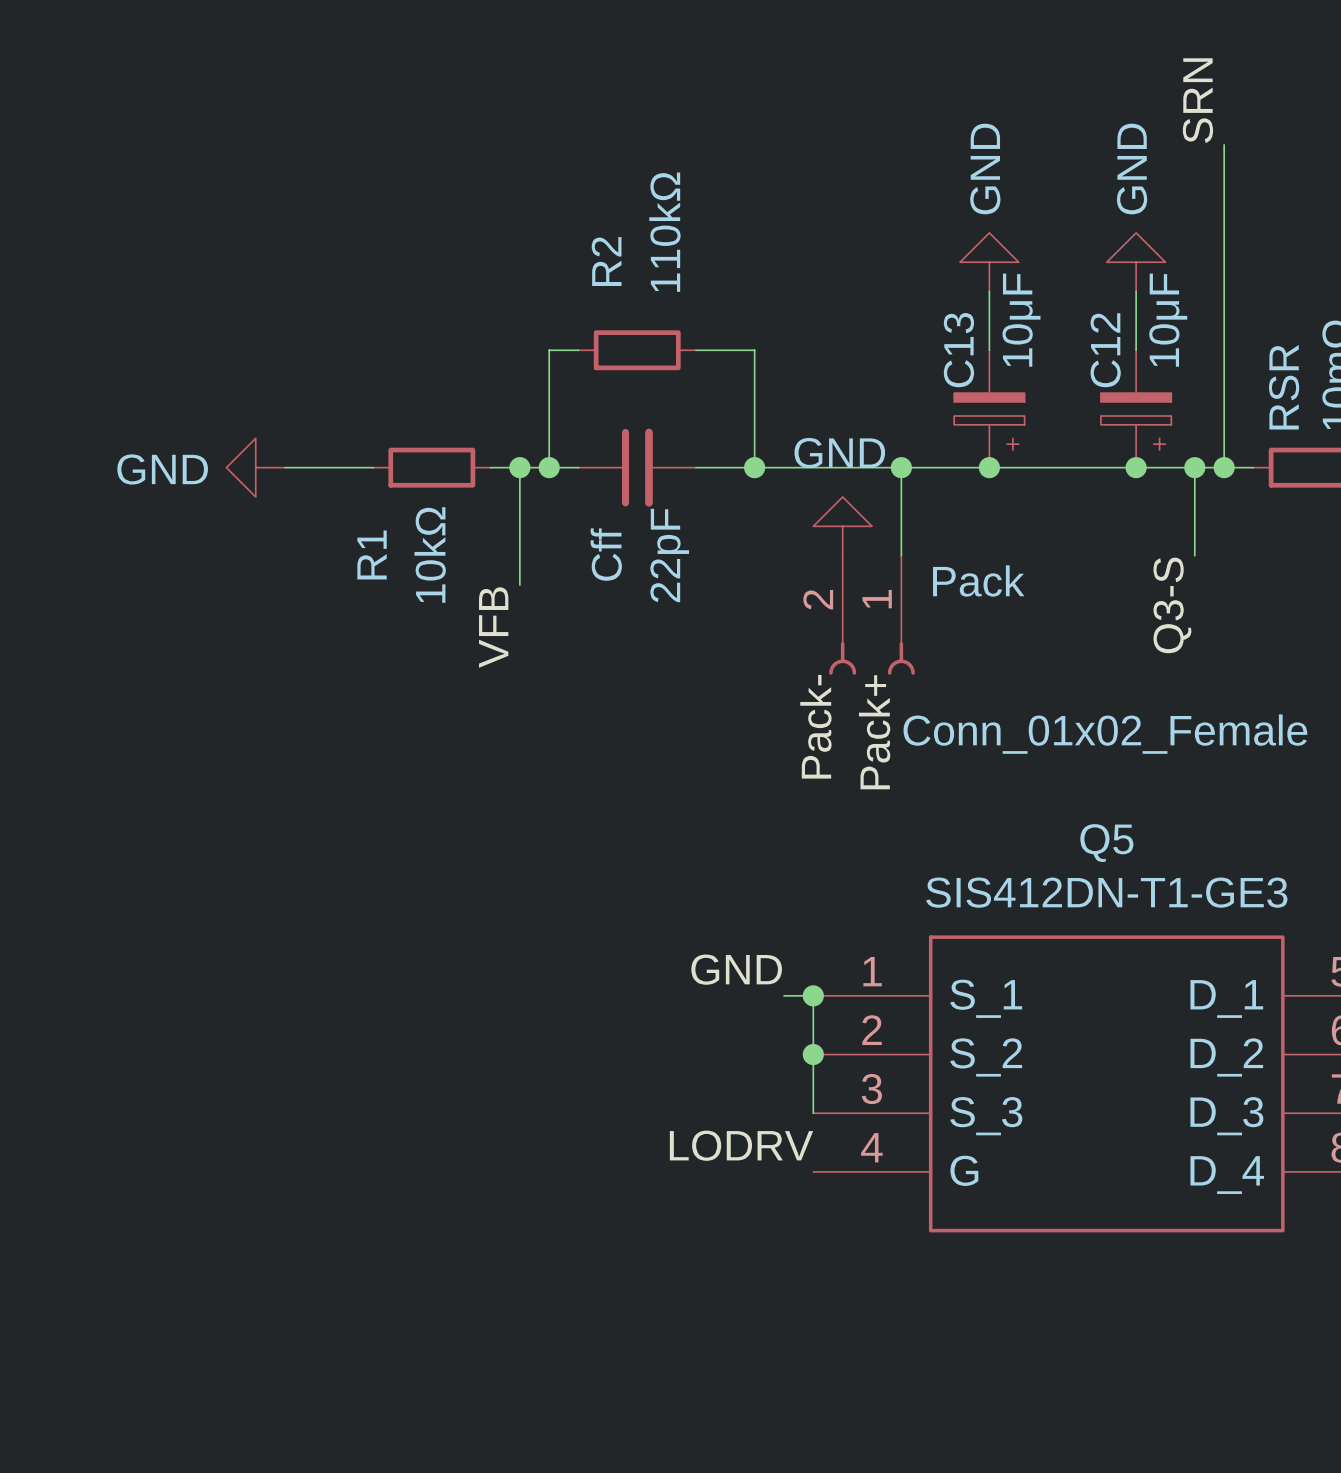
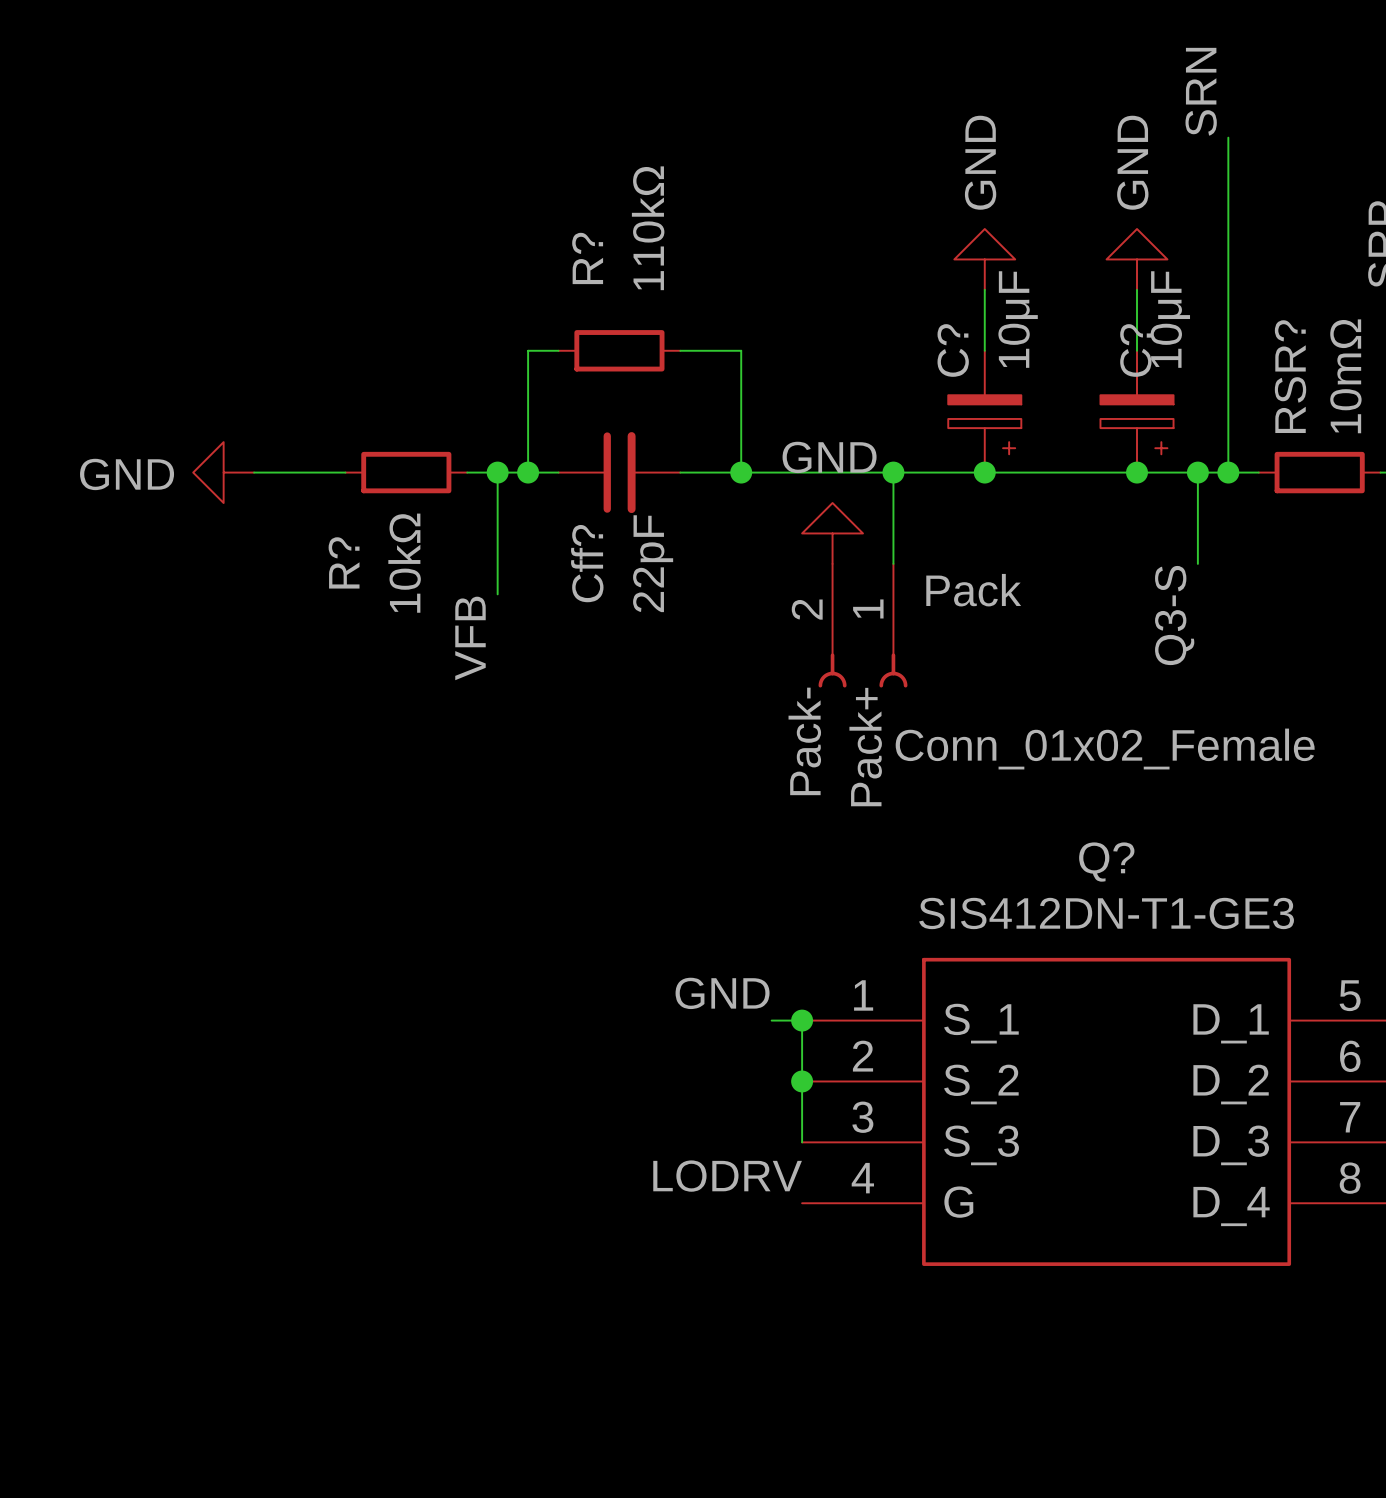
R2 name: R2 (606, 261) -> R? (587, 258)
C13 name: C13 (958, 350) -> C? (953, 350)
C12 name: C12 (1105, 350) -> C? (1135, 350)
RSR name: RSR (1284, 387) -> RSR? (1290, 376)
R1 name: R1 (372, 554) -> R? (344, 562)
Cff name: Cff (606, 554) -> Cff? (587, 563)
Q5 name: Q5 (1106, 843) -> Q? (1106, 862)

